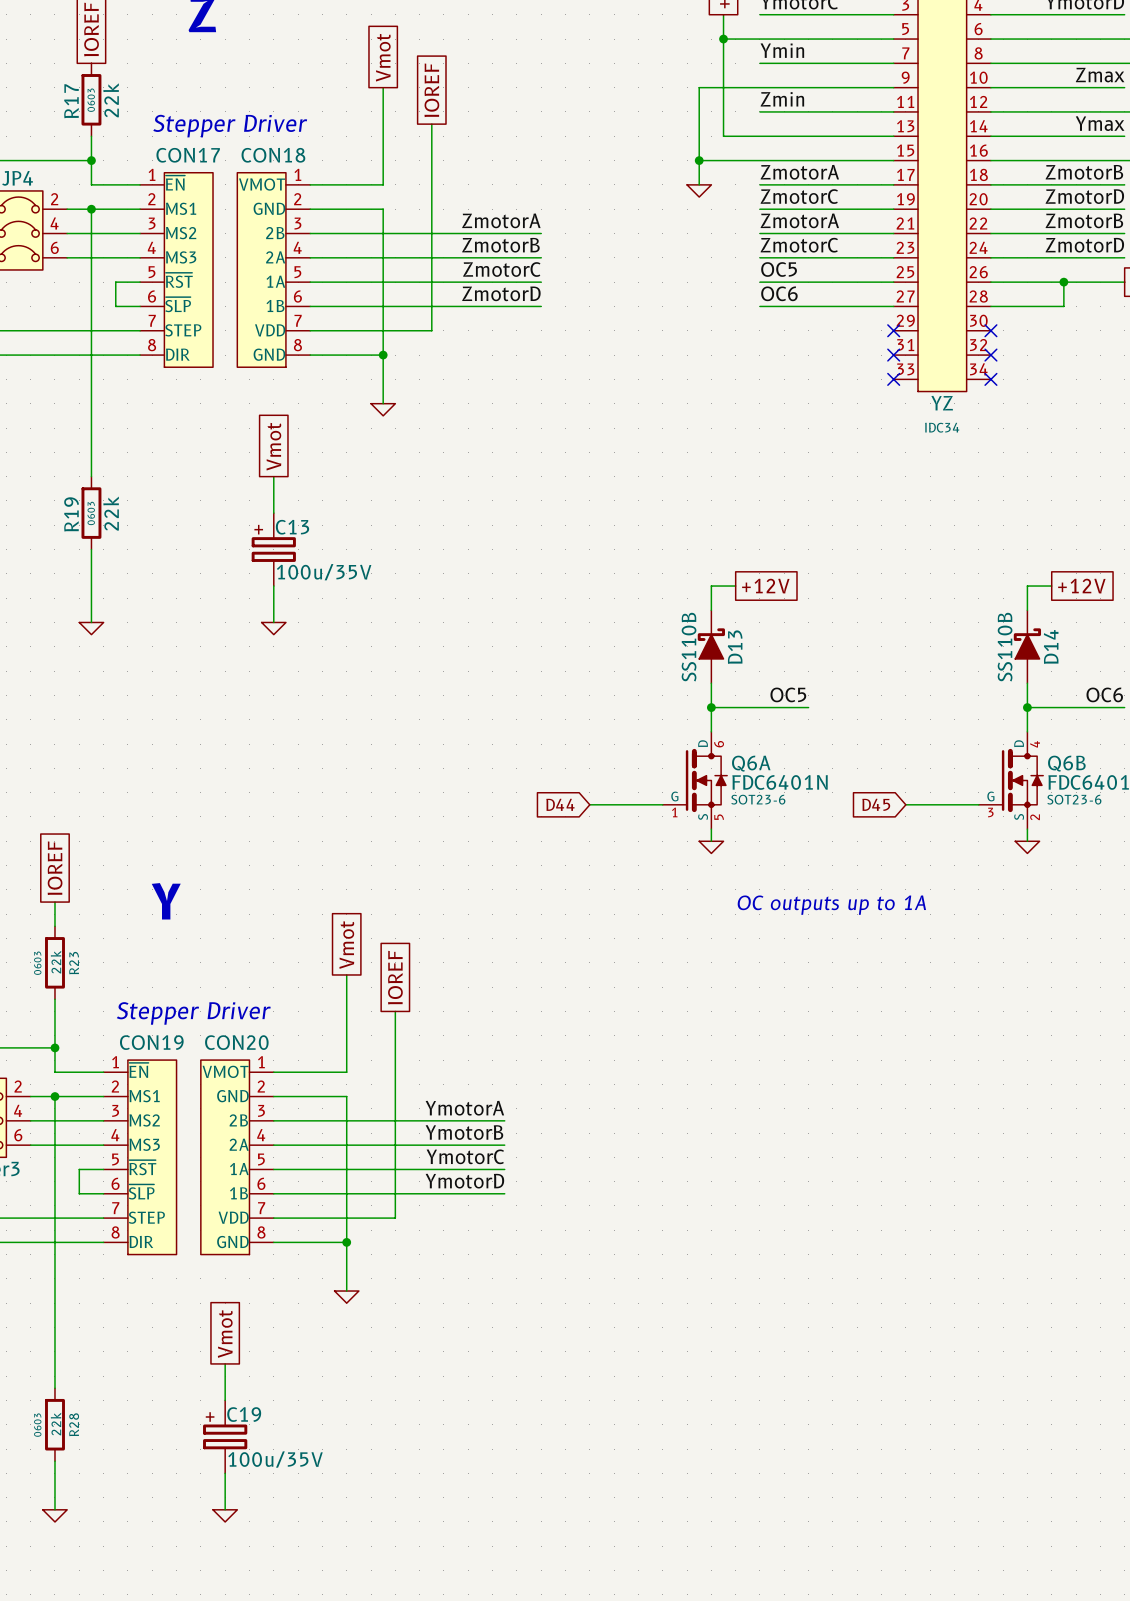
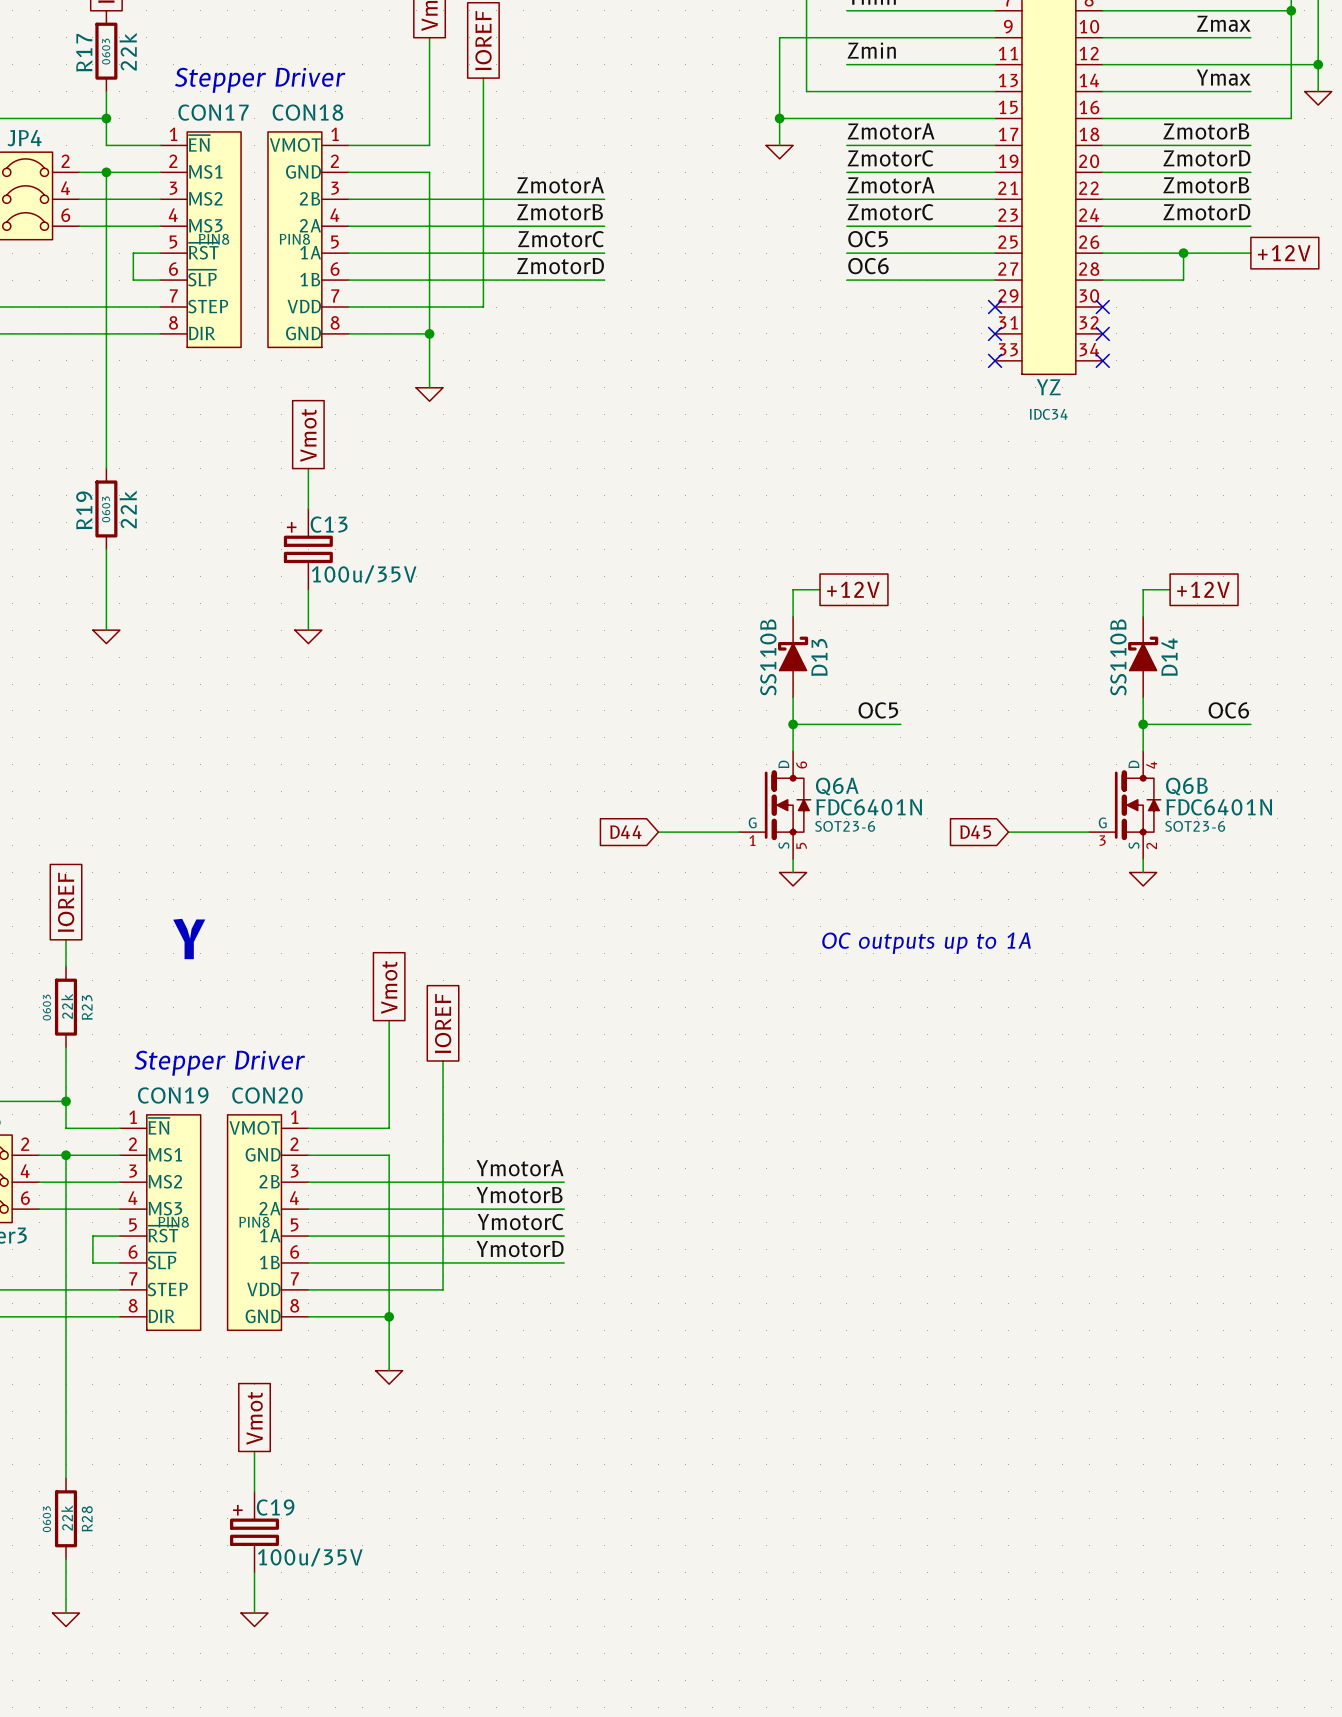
CON17 text: none -> PIN8 (214, 239)
CON18 text: none -> PIN8 (294, 239)
CON19 text: none -> PIN8 (173, 1222)
CON20 text: none -> PIN8 (254, 1222)

